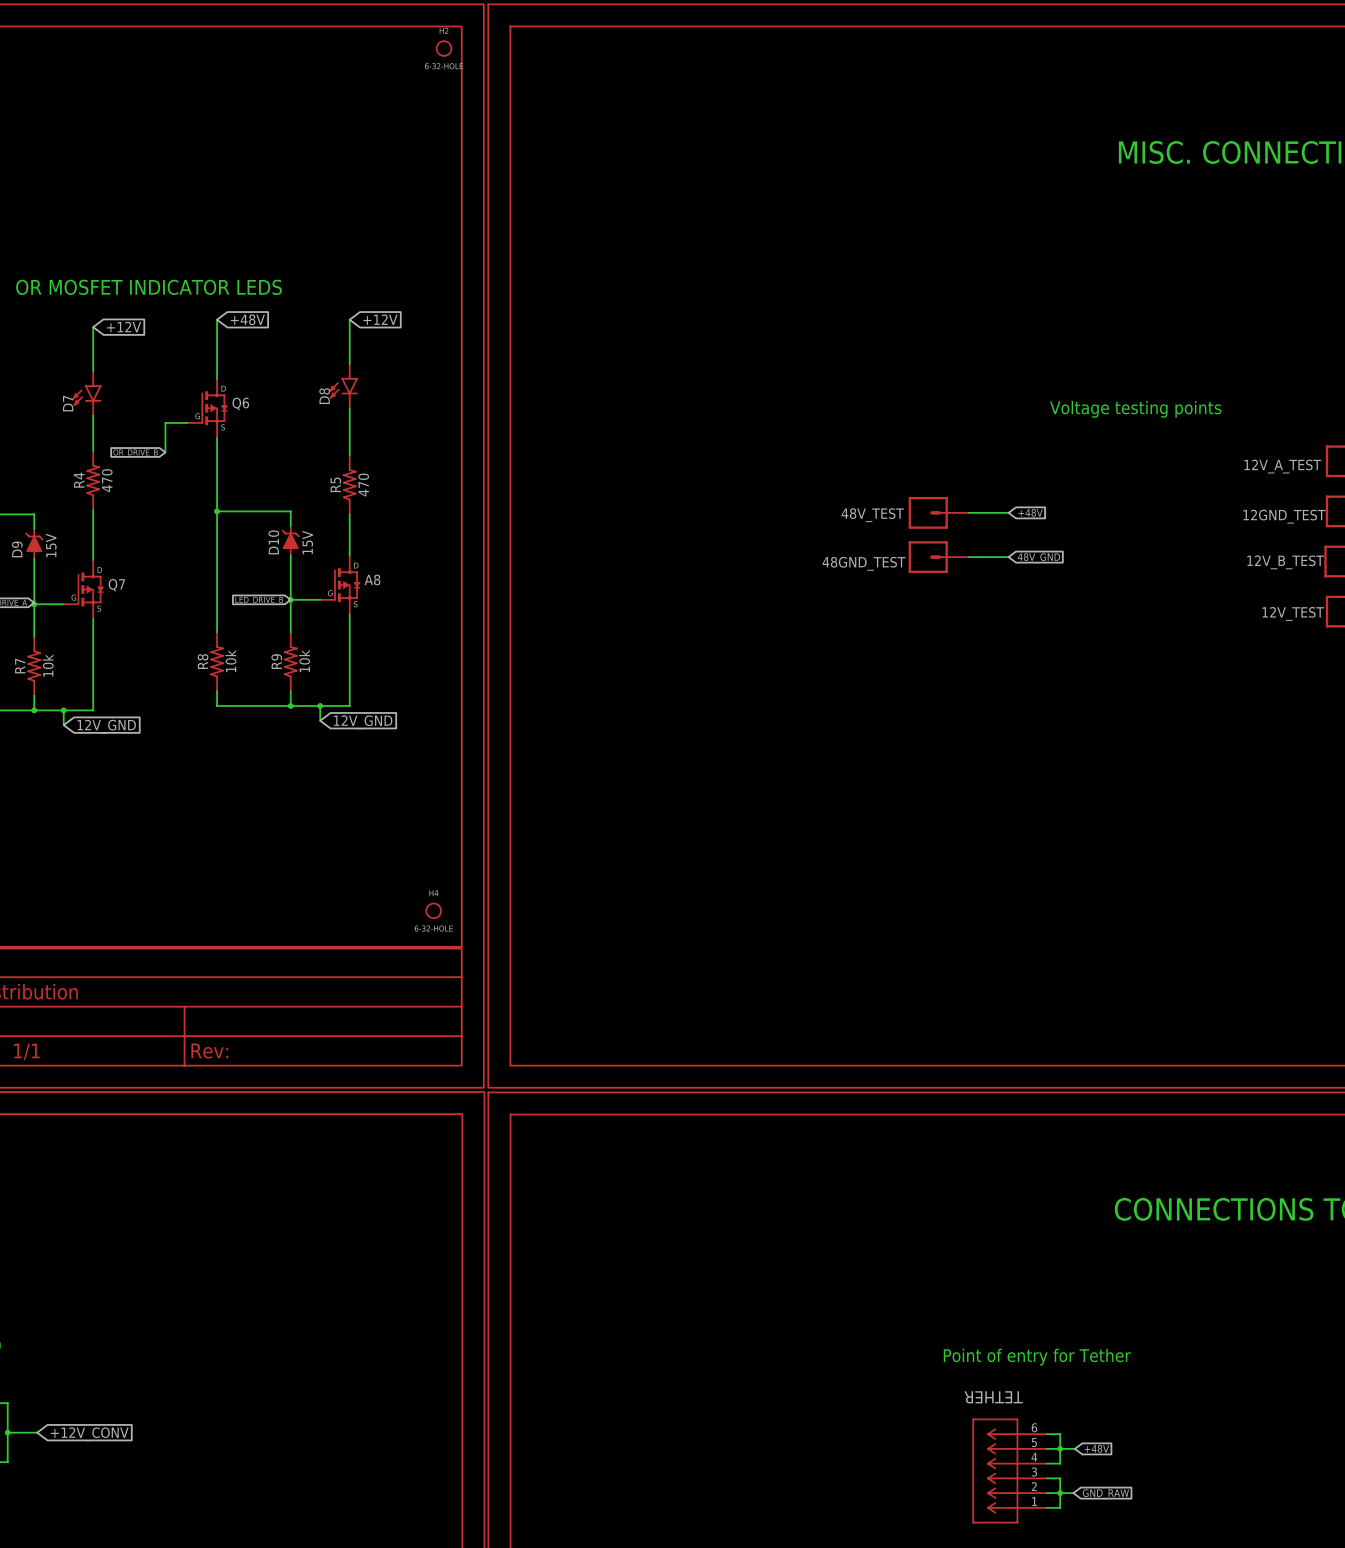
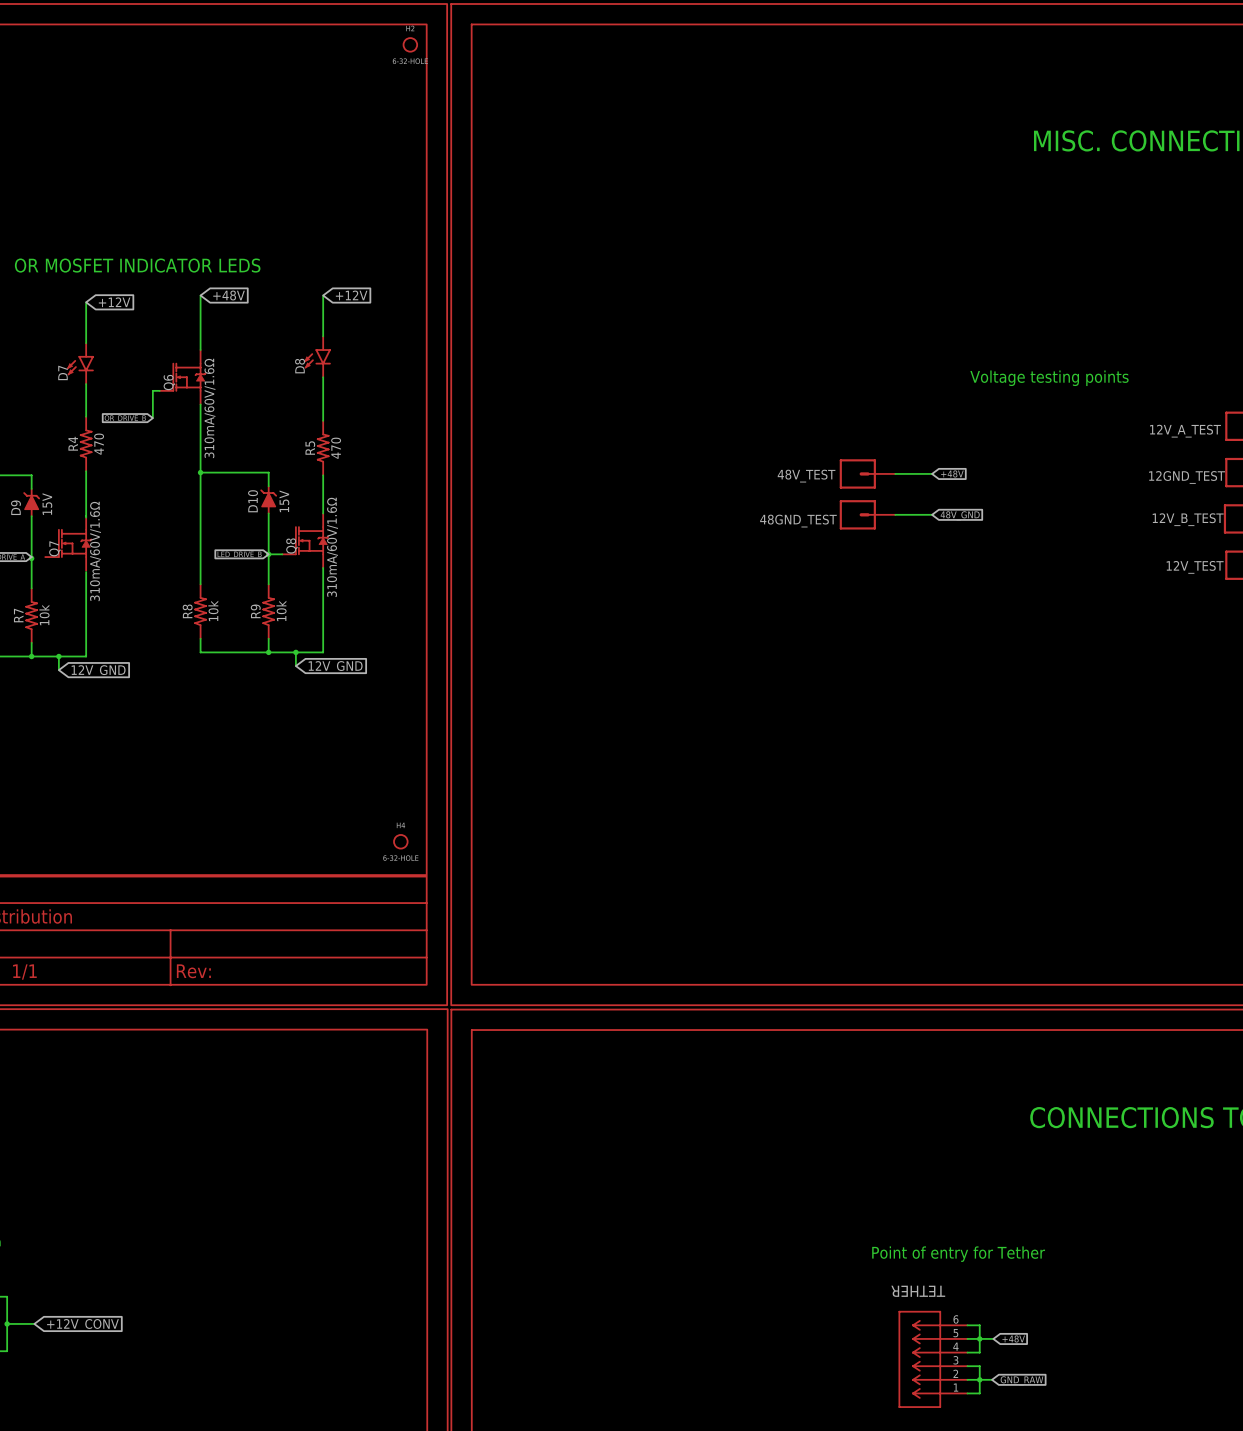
Q6 symbol: [187, 378, 228, 438] -> [159, 350, 207, 405]
Q6 name position: Q6 (240, 403) -> Q6 (169, 382)
Q6 value: none -> 310mA/60V/1.6Ω (209, 408)
Q7 symbol: [63, 560, 104, 620] -> [45, 516, 92, 571]
Q7 name position: Q7 (116, 585) -> Q7 (54, 548)
Q8: none -> 310mA/60V/1.6Ω (305, 540)
A8: (340, 585) -> none
Q7 value: none -> 310mA/60V/1.6Ω (95, 551)
wire: (34, 604) (63, 604) -> none

